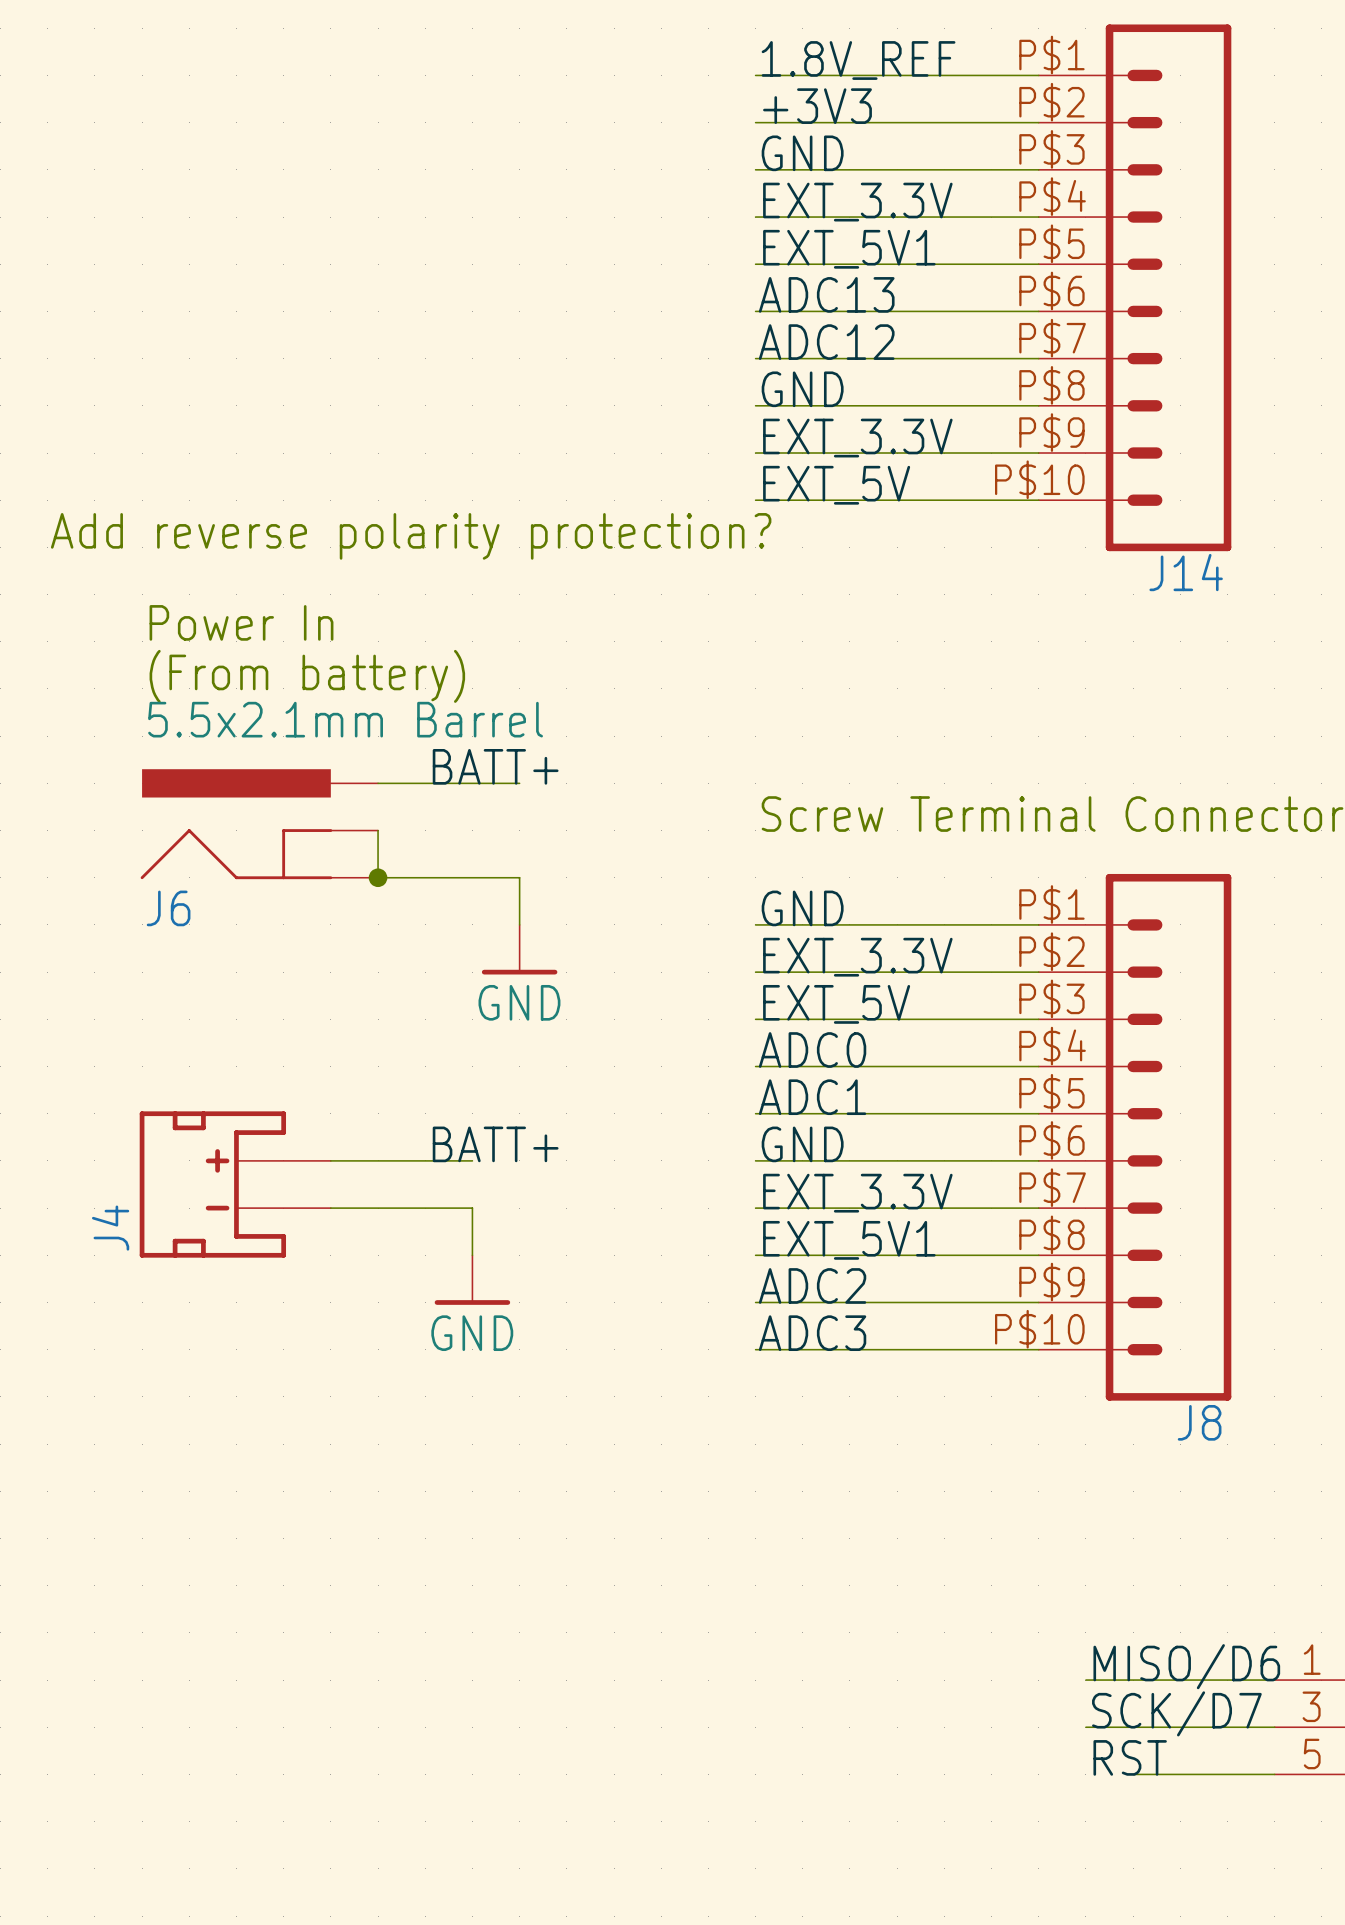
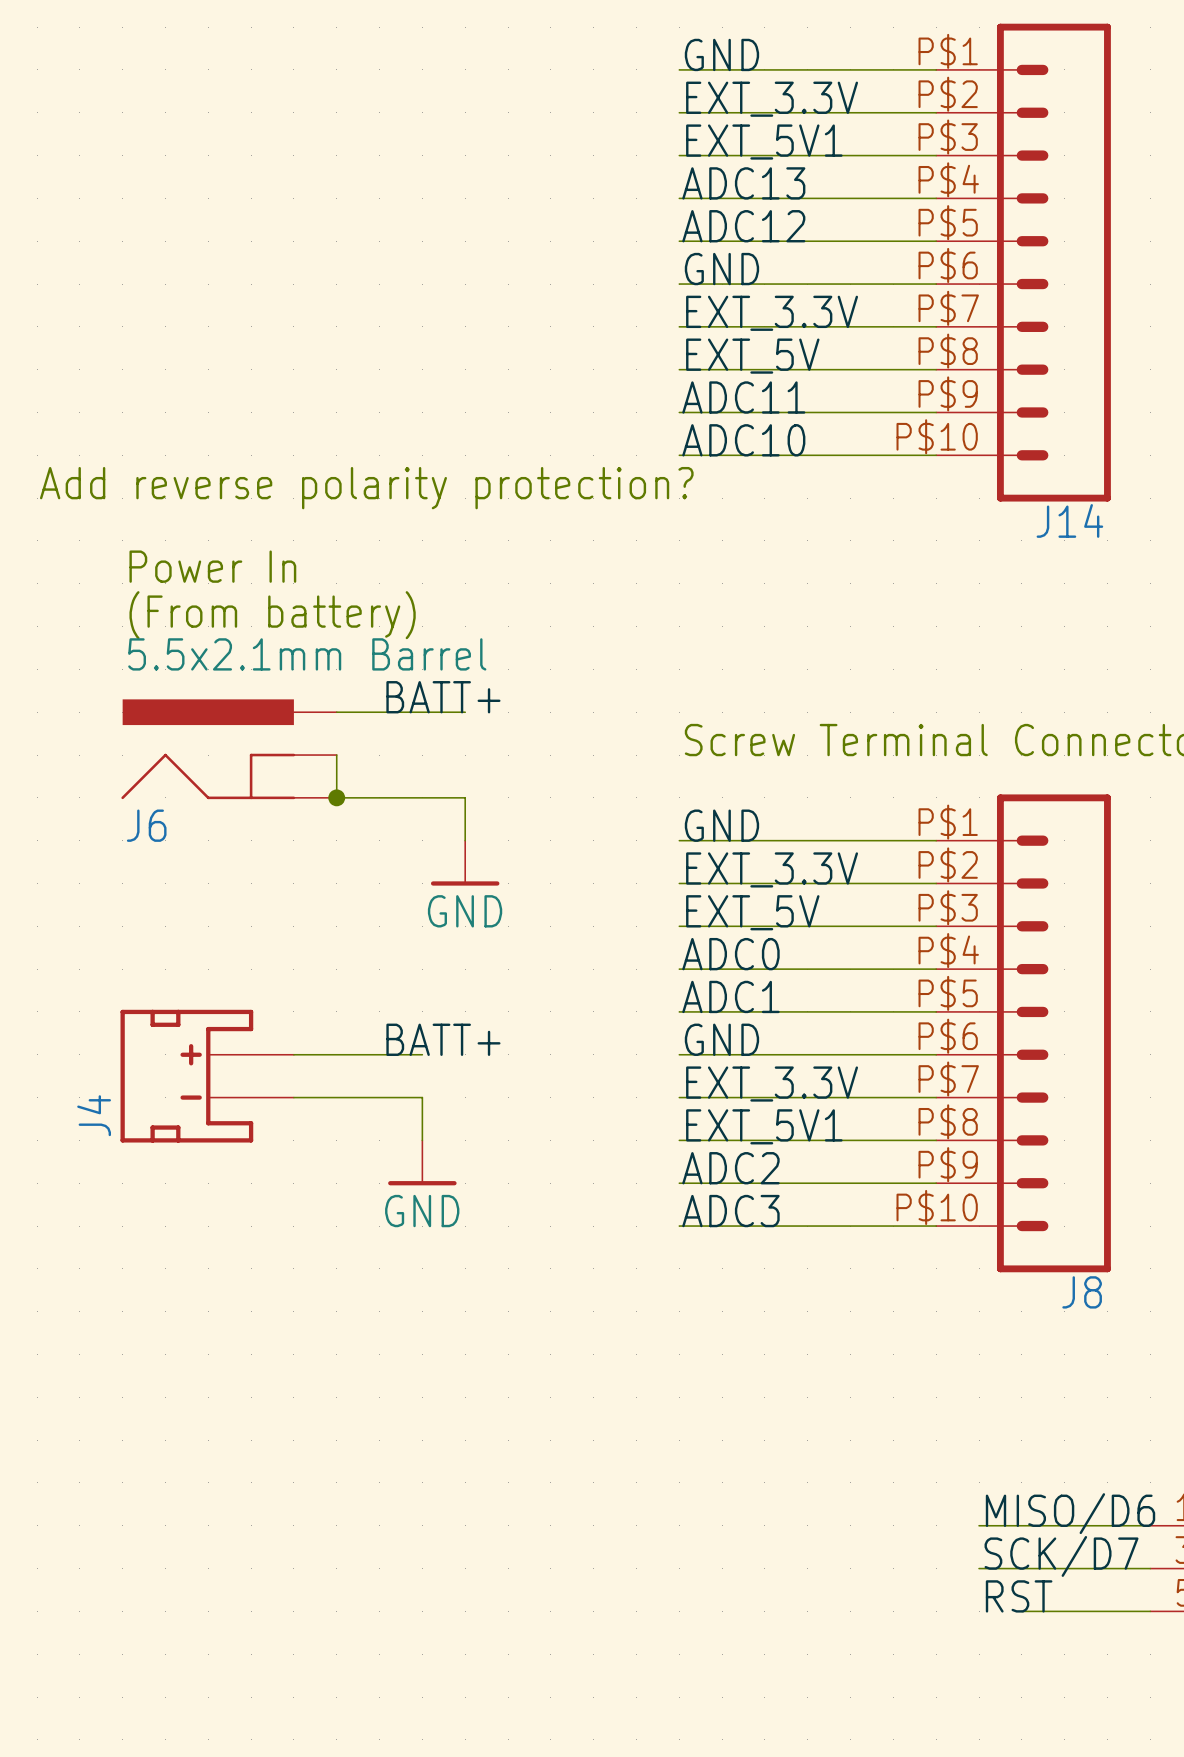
label: 1.8V_REF (858, 60) -> GND (721, 54)
label: +3V3 (817, 106) -> EXT_3.3V (772, 99)
label: GND (802, 153) -> EXT_5V1 (764, 142)
label: EXT_3.3V (857, 202) -> ADC13 (743, 183)
label: EXT_5V1 (849, 249) -> ADC12 (743, 226)
label: ADC13 (826, 294) -> GND (721, 269)
label: ADC12 (826, 342) -> EXT_3.3V (772, 313)
label: GND (802, 389) -> EXT_5V (752, 356)
label: EXT_3.3V (857, 438) -> ADC11 (743, 397)
label: EXT_5V (836, 485) -> ADC10 (743, 440)

